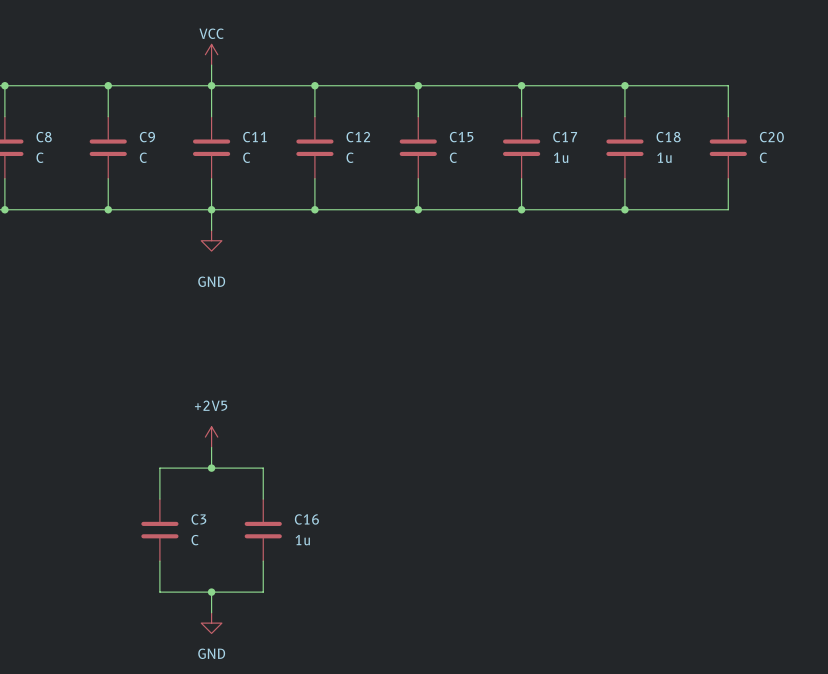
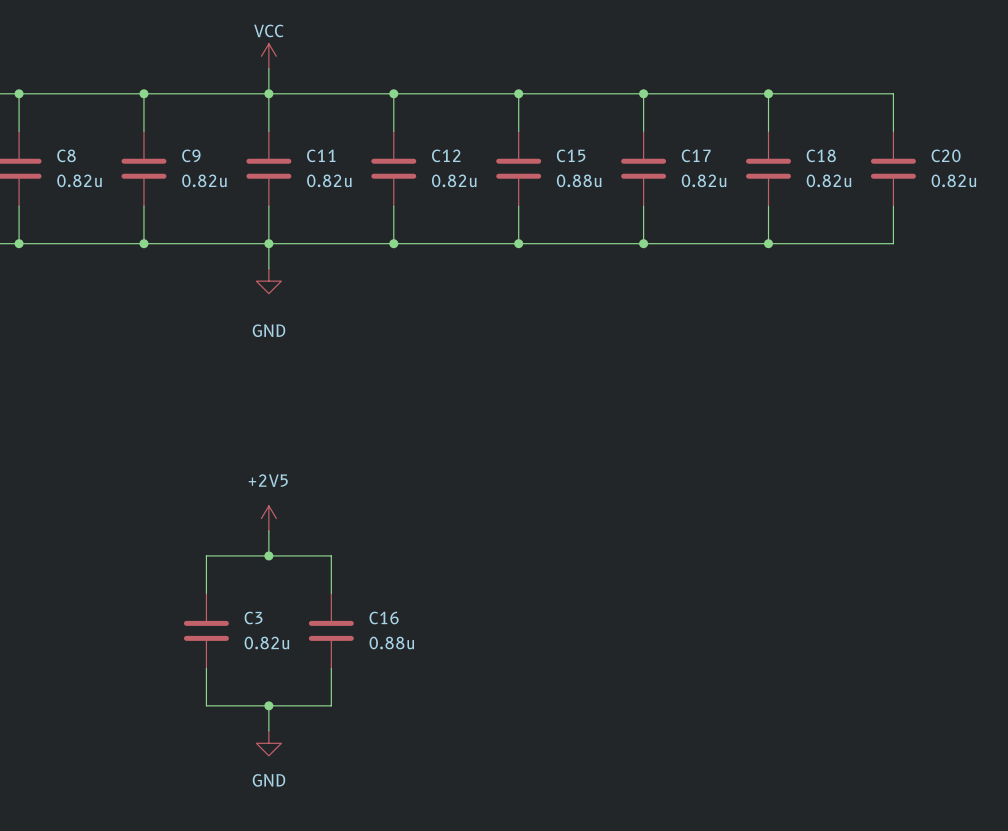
C8 value: C (40, 157) -> 0.82u (79, 180)
C9 value: C (143, 157) -> 0.82u (204, 180)
C11 value: C (246, 157) -> 0.82u (329, 180)
C12 value: C (350, 157) -> 0.82u (454, 180)
C15 value: C (453, 157) -> 0.88u (579, 180)
C17 value: 1u (561, 157) -> 0.82u (704, 180)
C18 value: 1u (664, 157) -> 0.82u (828, 180)
C20 value: C (763, 157) -> 0.82u (953, 180)
C3 value: C (195, 540) -> 0.82u (266, 643)
C16 value: 1u (302, 540) -> 0.88u (391, 643)

